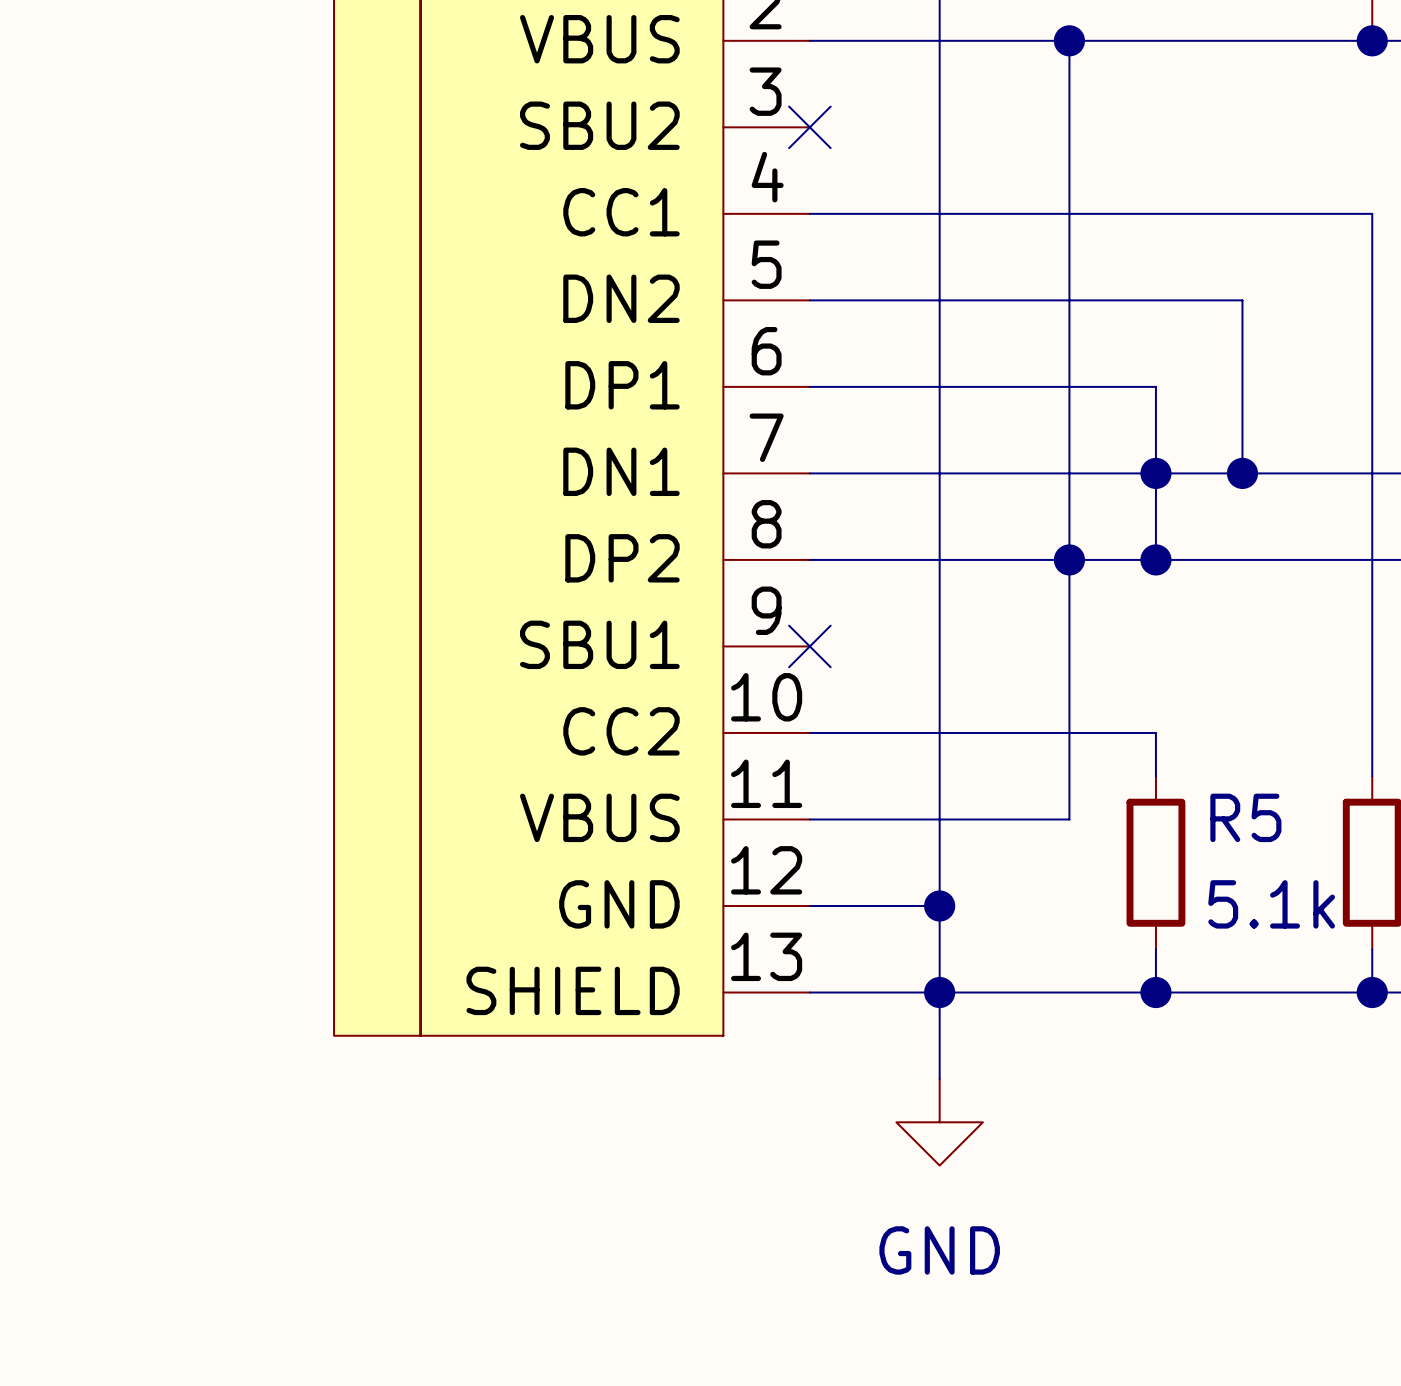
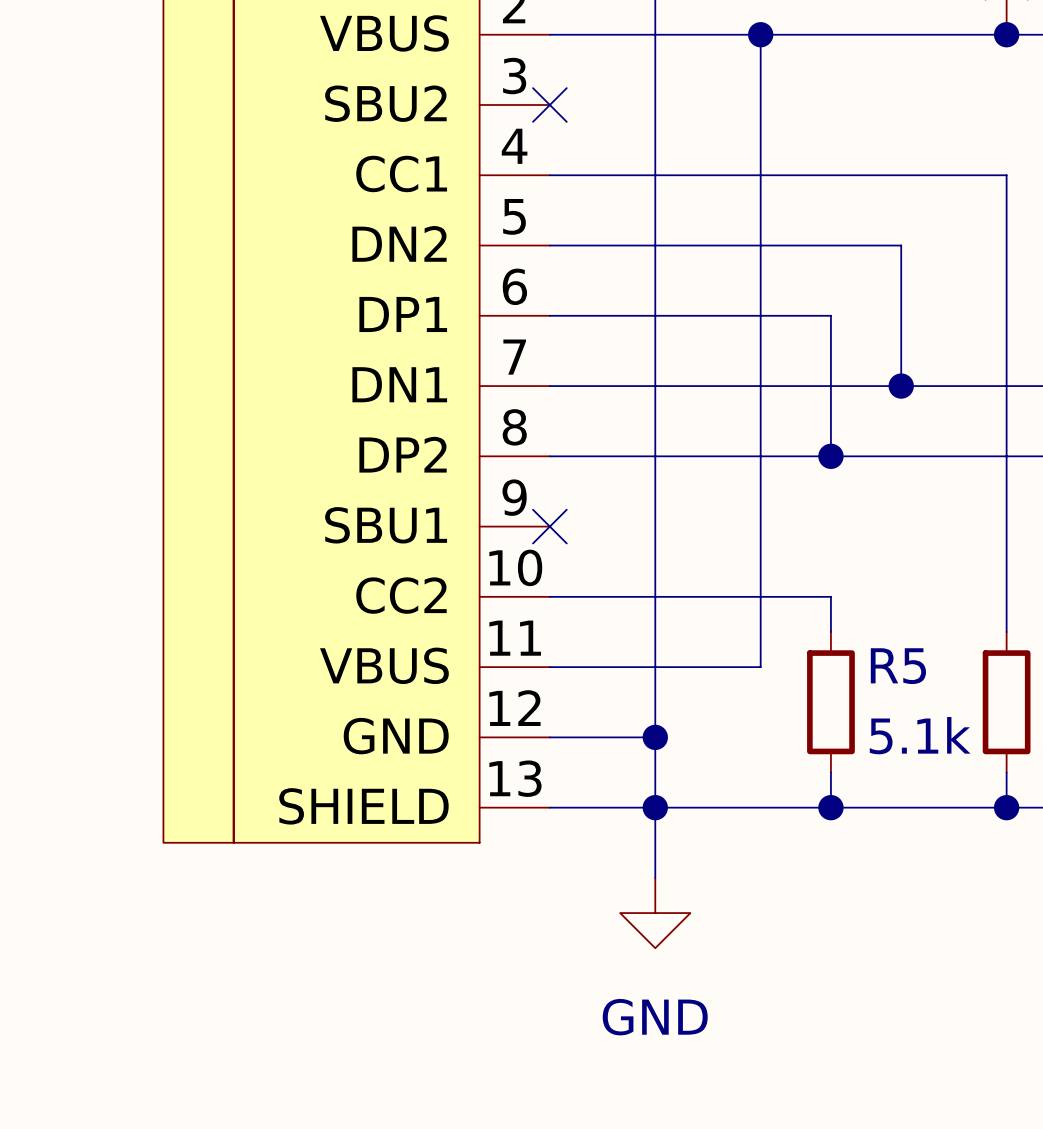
junction: (1155, 473) -> none
junction: (1069, 559) -> none

